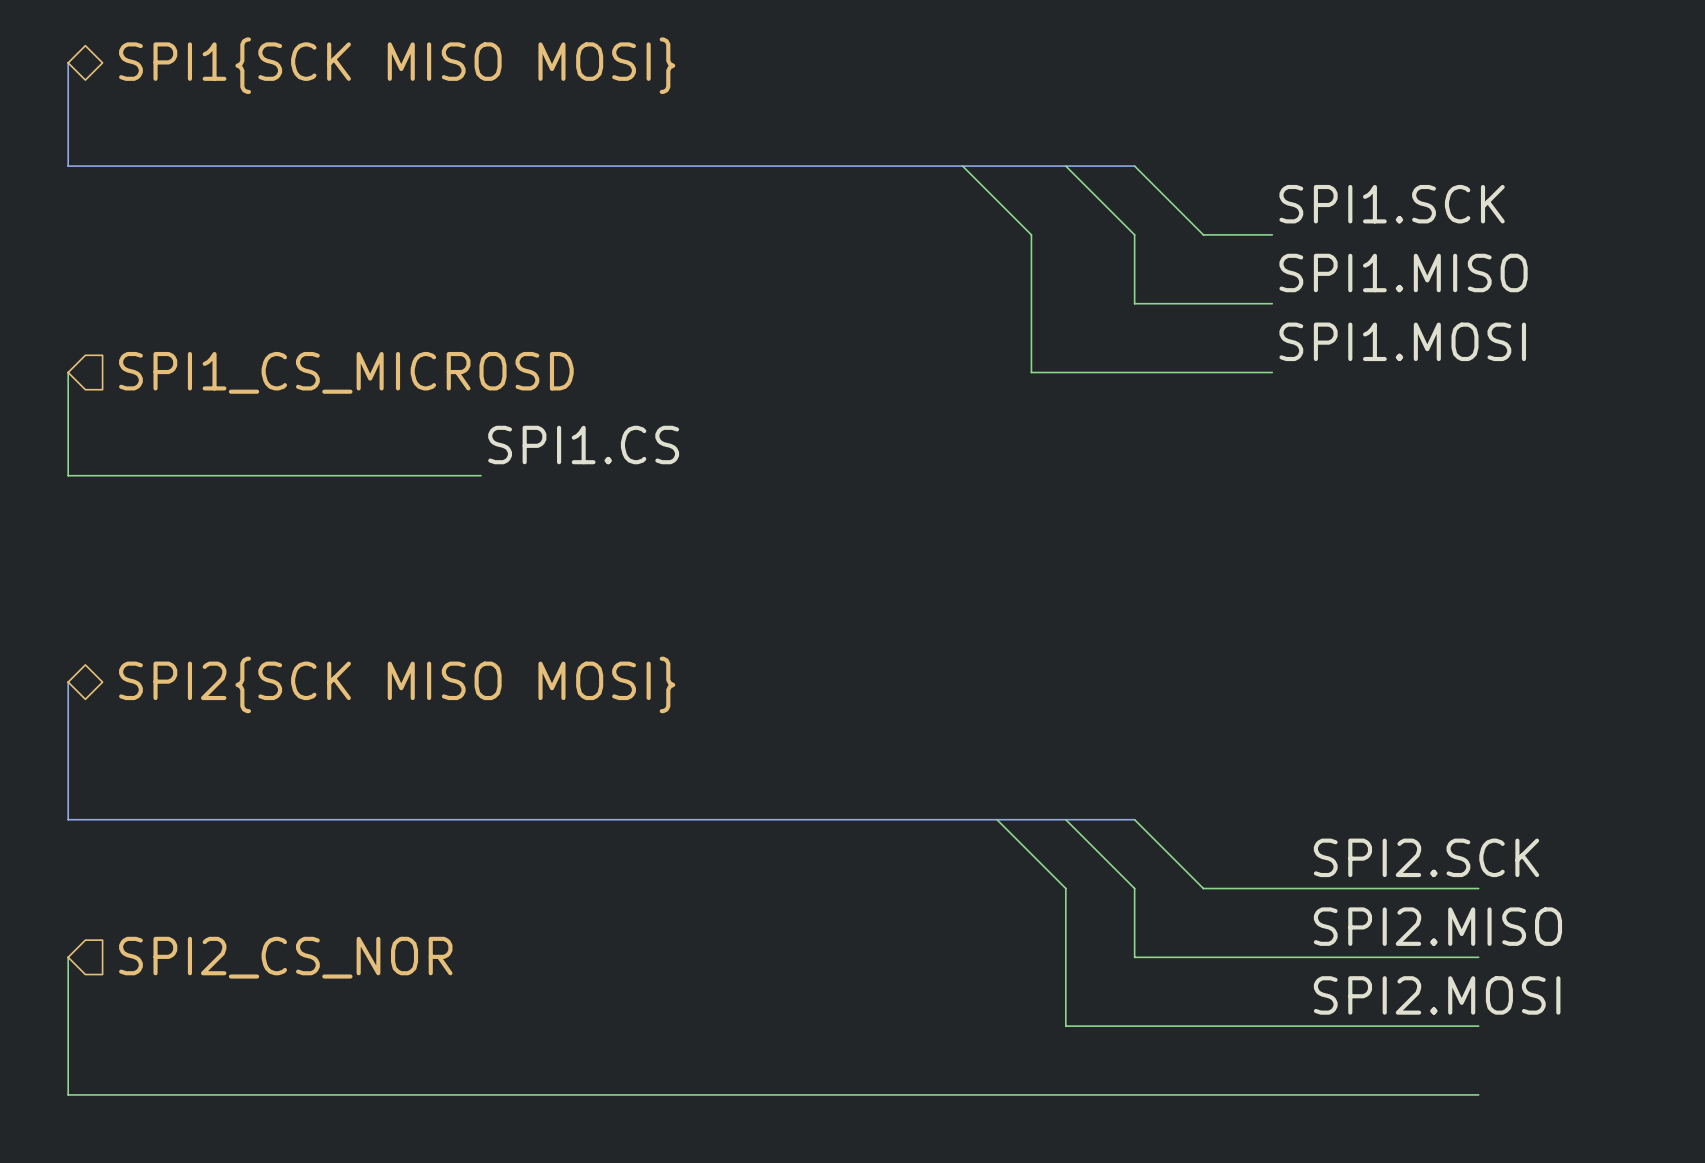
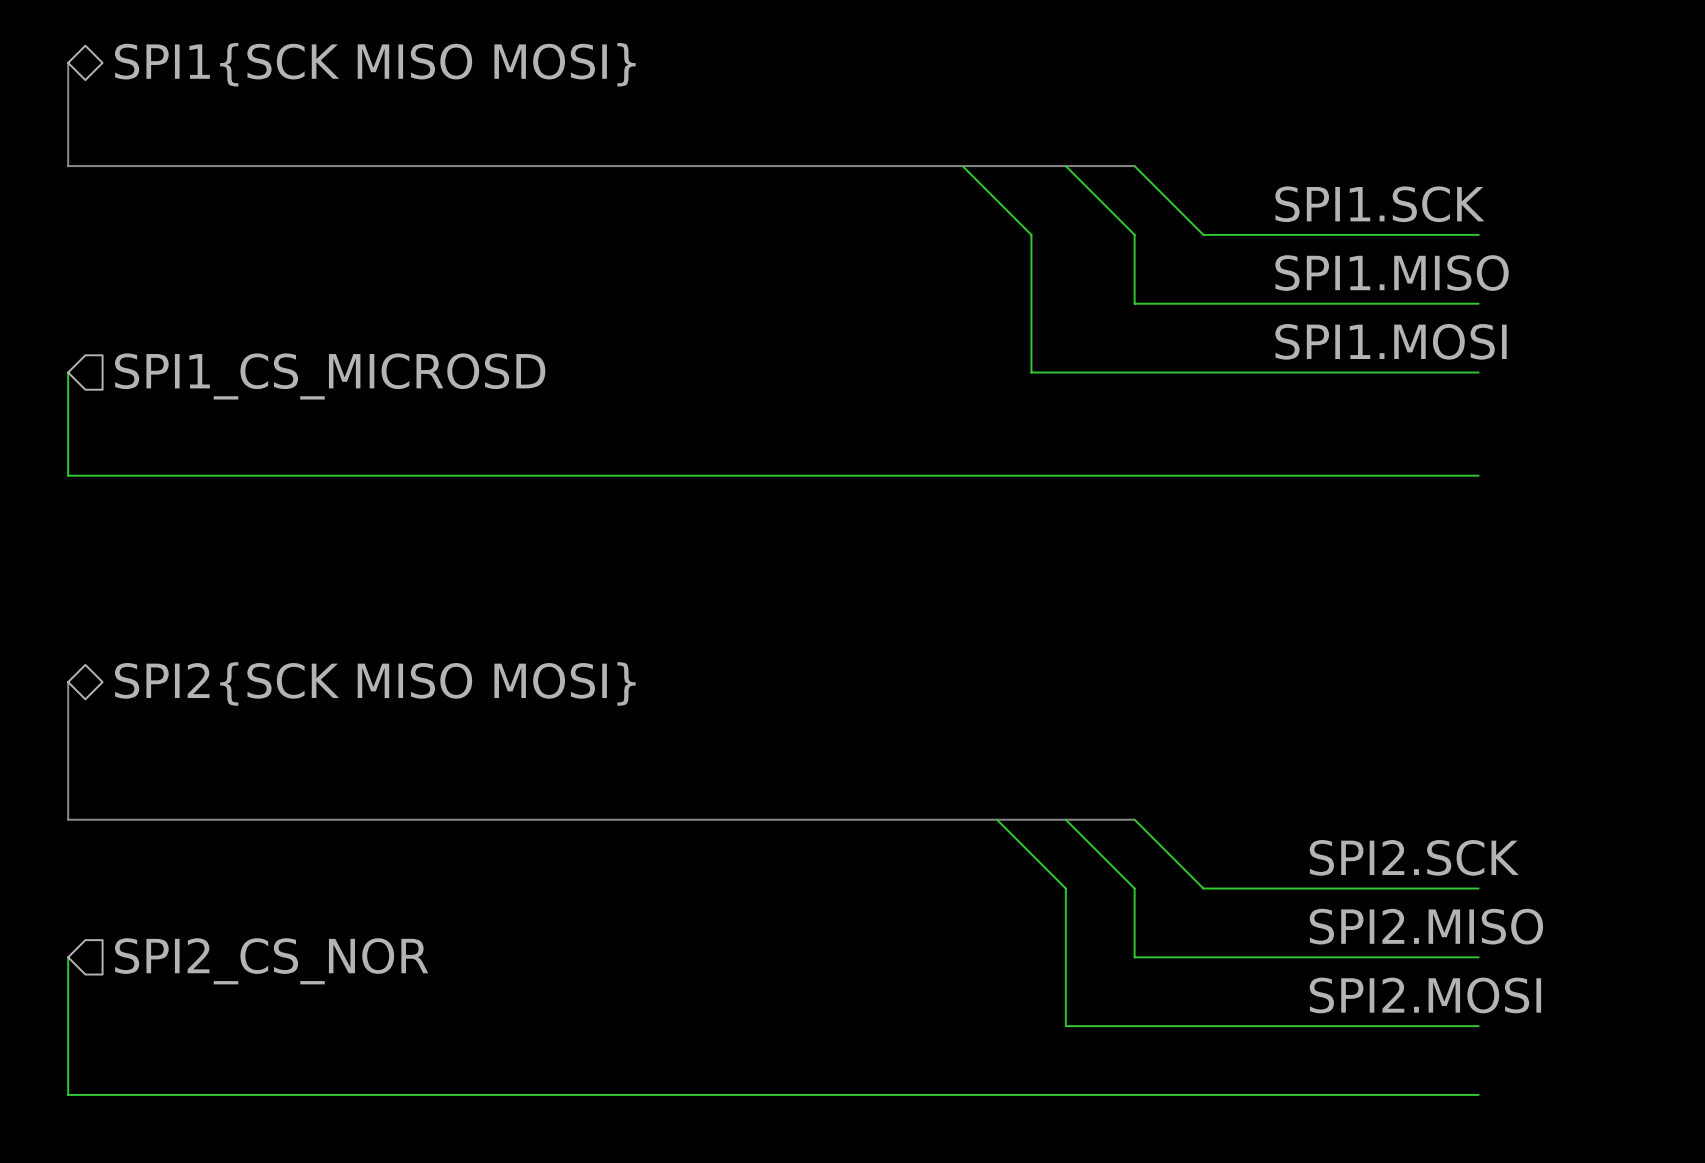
wire: none -> (1272, 234) (1478, 234)
wire: none -> (1272, 303) (1478, 303)
wire: none -> (1272, 372) (1478, 372)
label: SPI1.CS (583, 445) -> none
wire: none -> (481, 475) (1478, 475)

